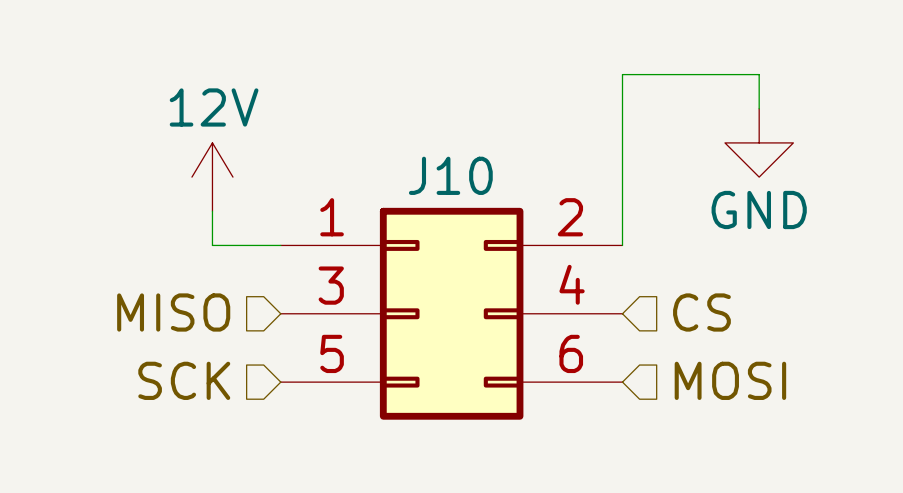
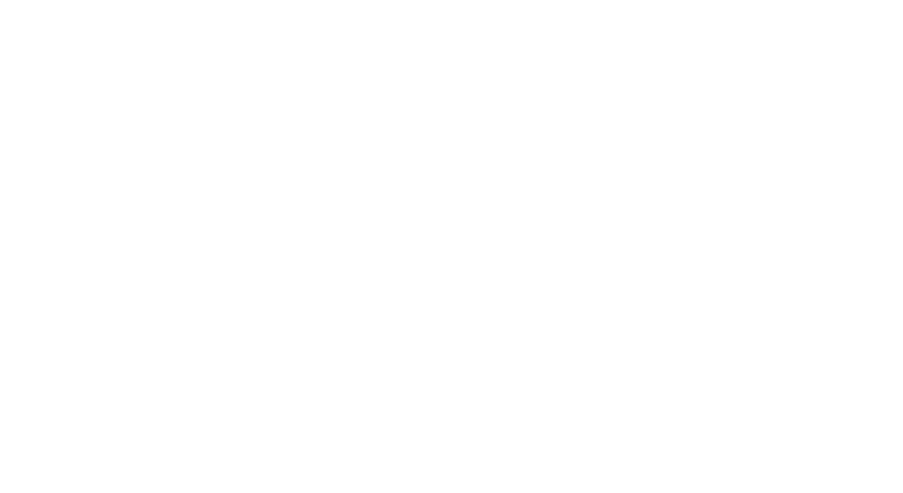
wire: (759, 108) (759, 74) (622, 74) (622, 245) -> none
power symbol: GND (759, 142) -> none
power symbol: 12V (212, 177) -> none
wire: (212, 211) (212, 245) (280, 245) -> none
hierarchical label: MISO (173, 312) -> none
hierarchical label: CS (701, 312) -> none
J10: (451, 313) -> none
hierarchical label: SCK (184, 380) -> none
hierarchical label: MOSI (730, 380) -> none

